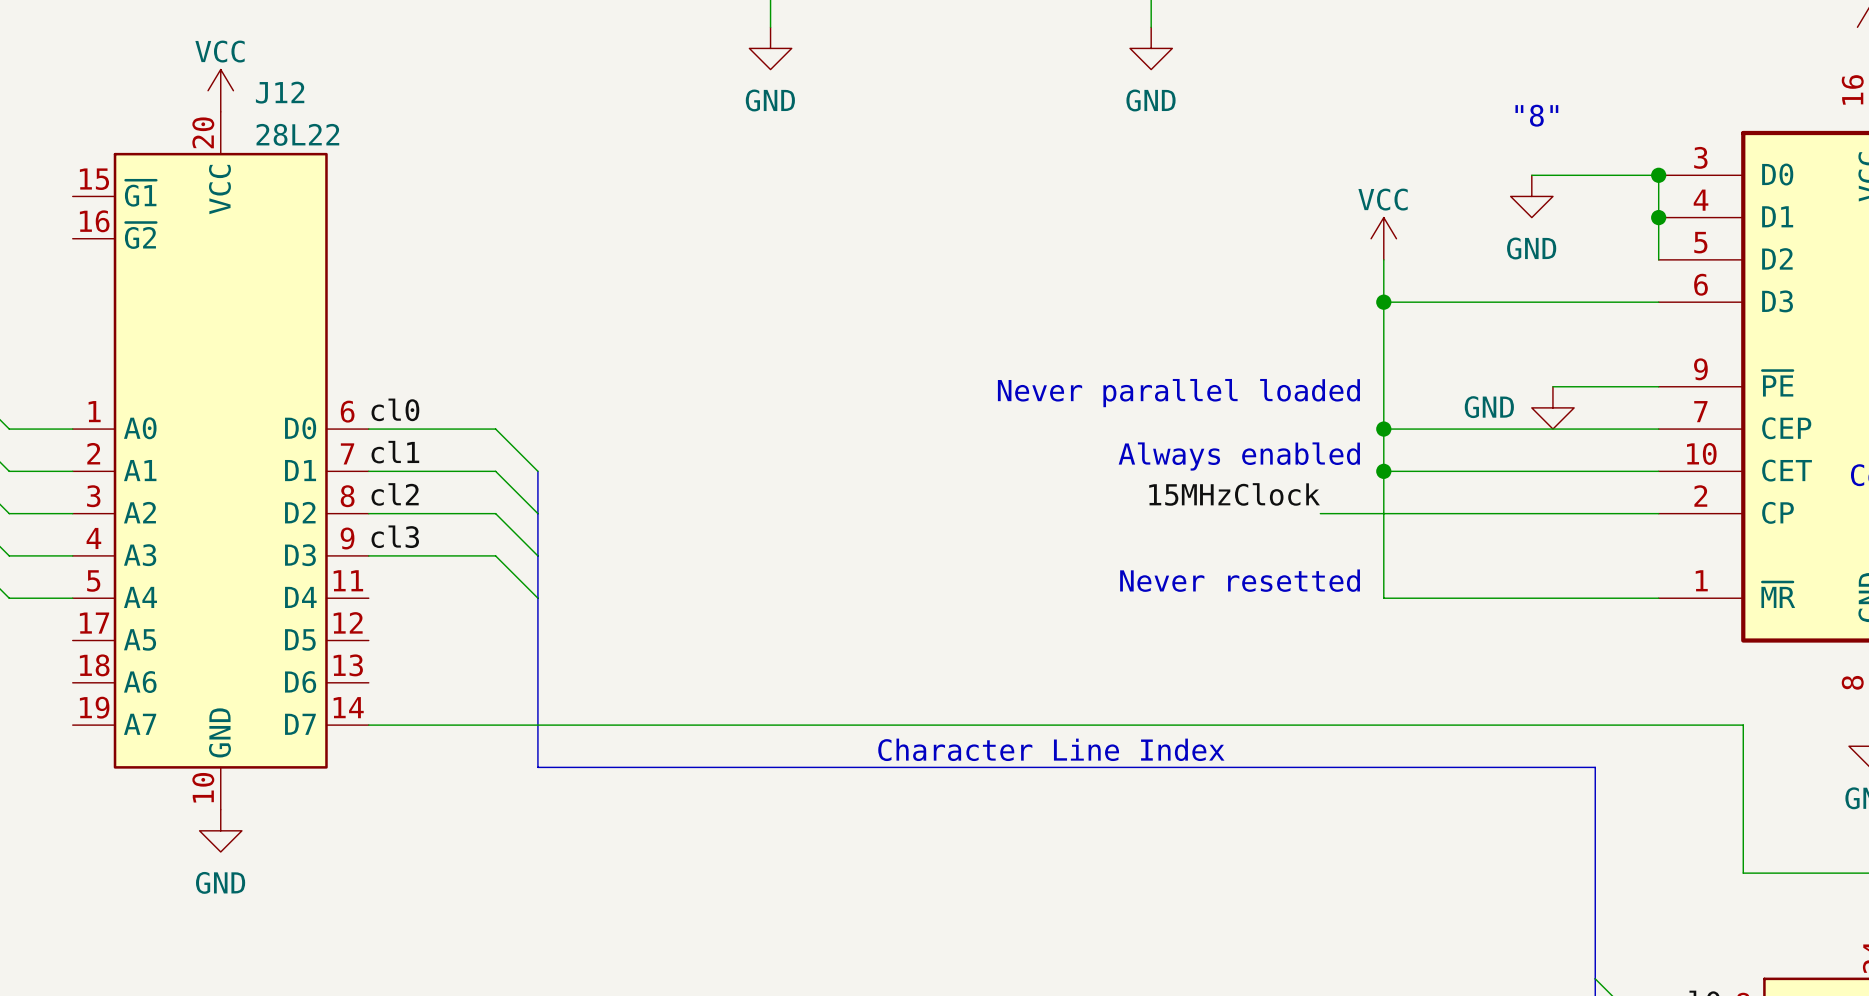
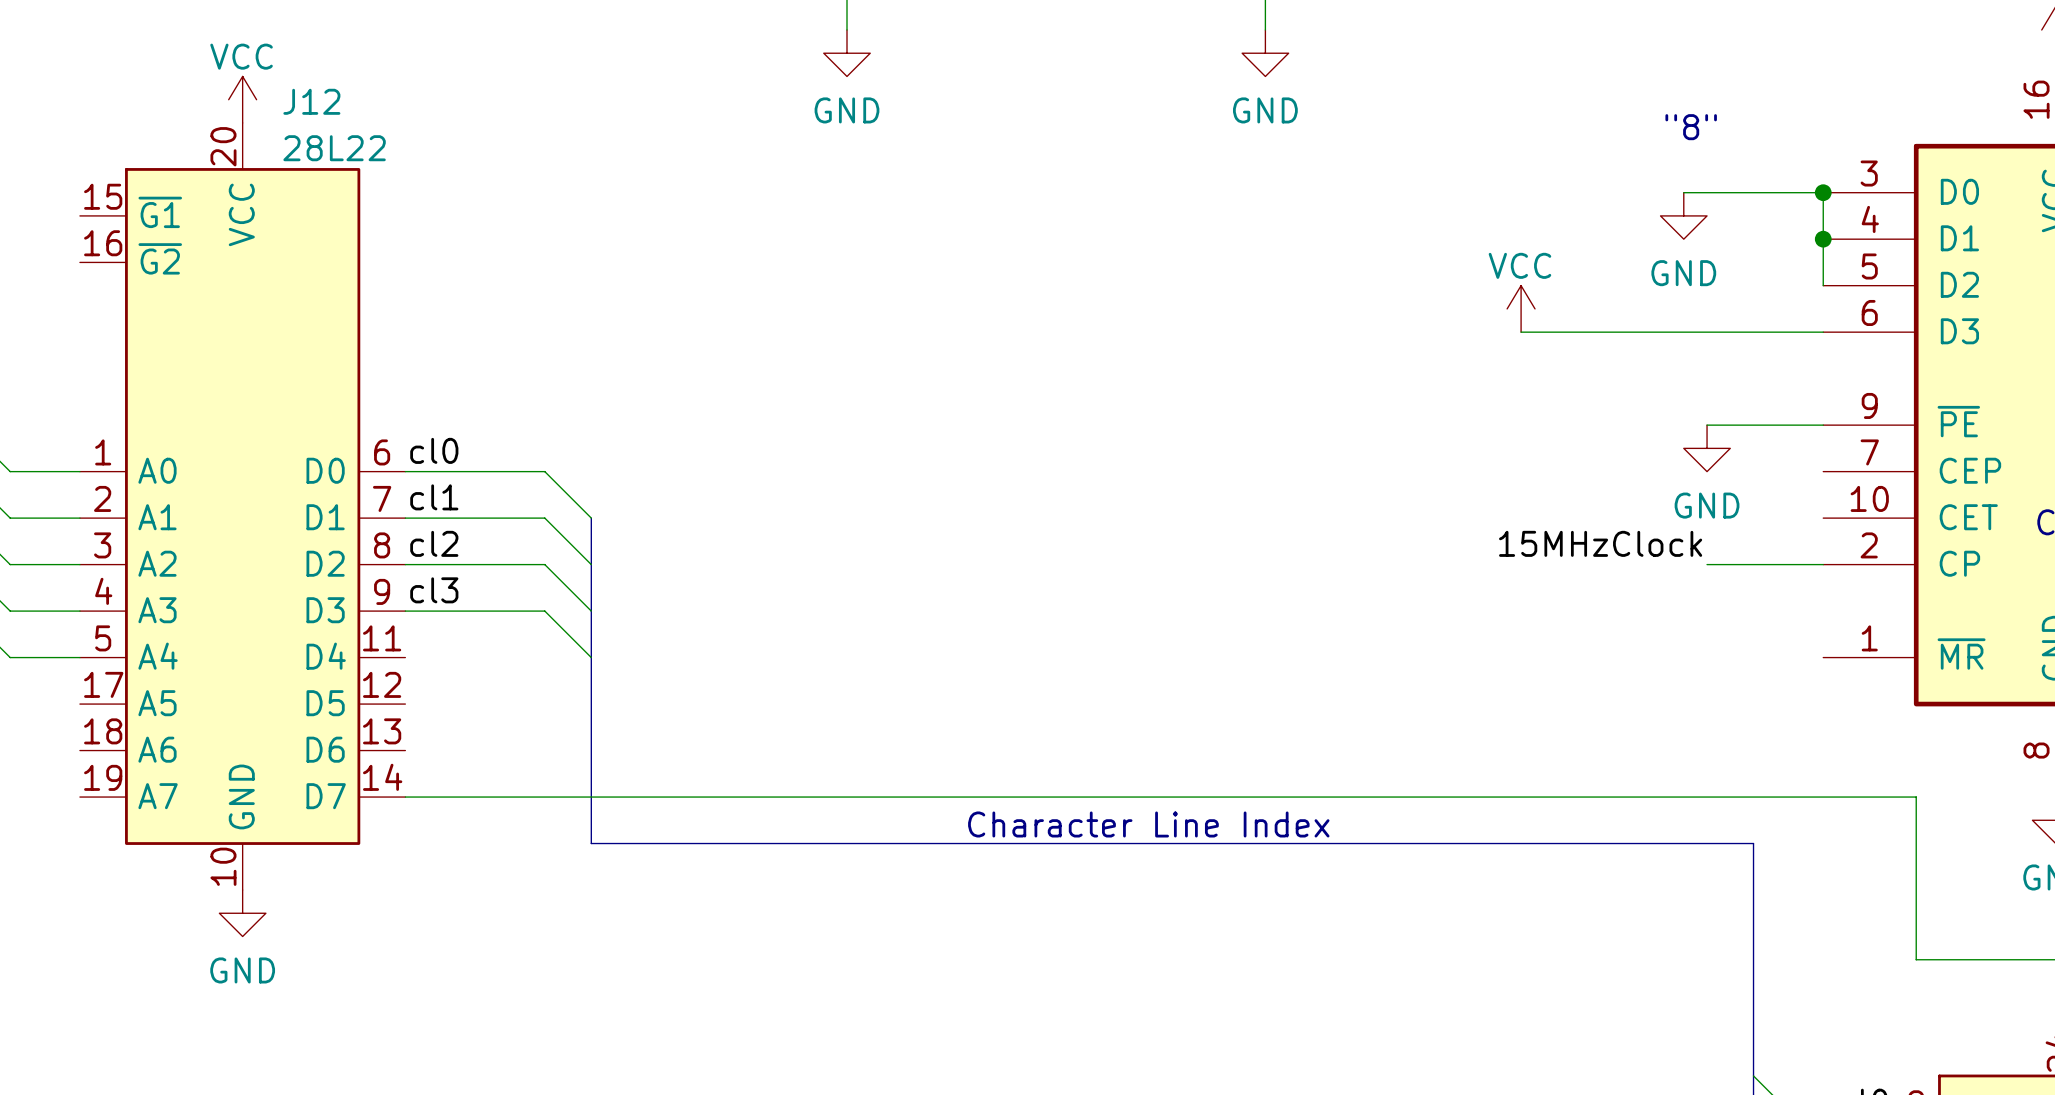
power symbol position: VCC (1383, 238) -> VCC (1521, 308)
wire: (1383, 259) (1383, 598) (1658, 598) -> none
junction: (1383, 302) -> none
text: Never parallel loaded (1178, 393) -> none
power symbol text position: GND (1489, 407) -> GND (1707, 505)
wire: (1383, 429) (1658, 429) -> none
junction: (1383, 429) -> none
text: Always enabled (1239, 456) -> none
wire: (1383, 471) (1658, 471) -> none
junction: (1383, 471) -> none
label position: 15MHzClock (1234, 494) -> 15MHzClock (1600, 543)
wire: (1320, 513) (1552, 513) -> none
text: Never resetted (1240, 580) -> none

